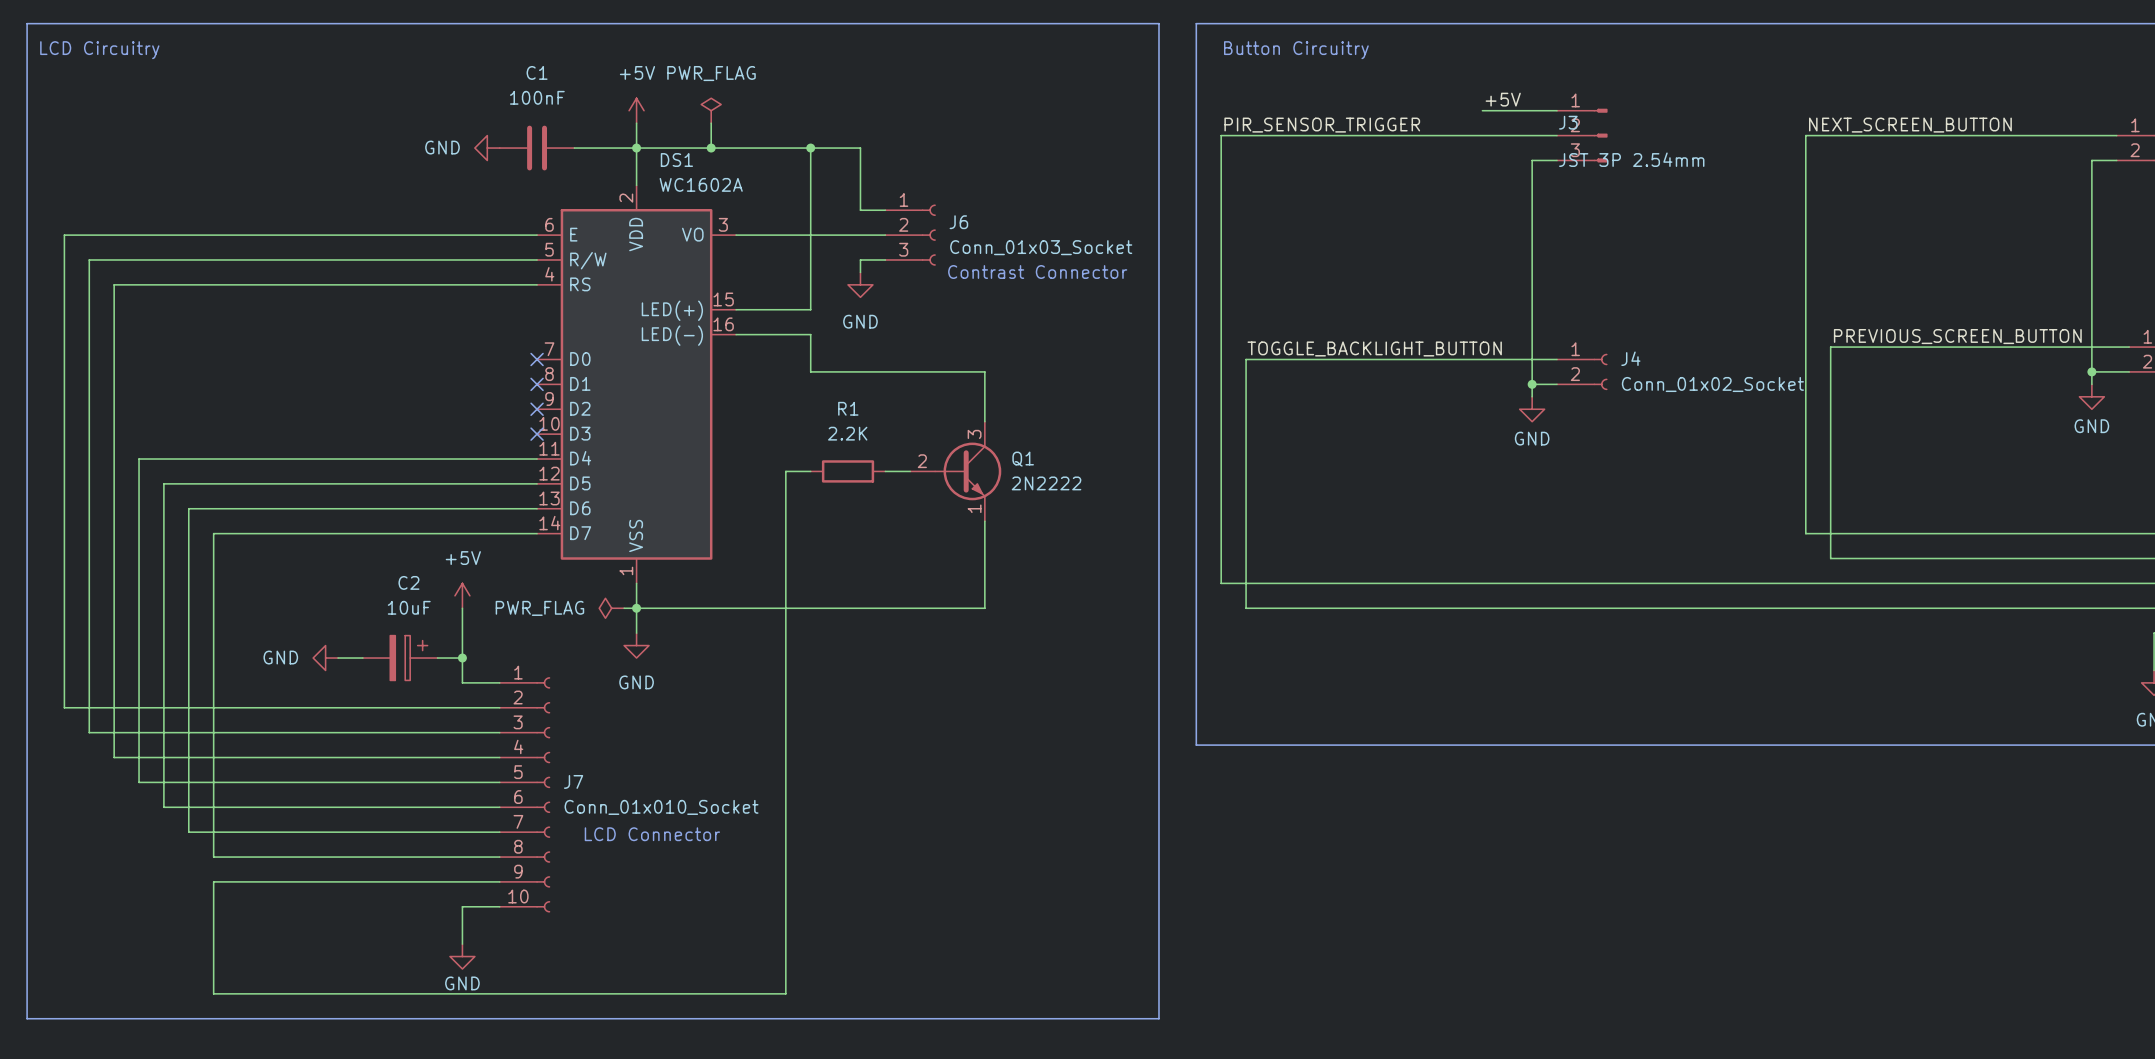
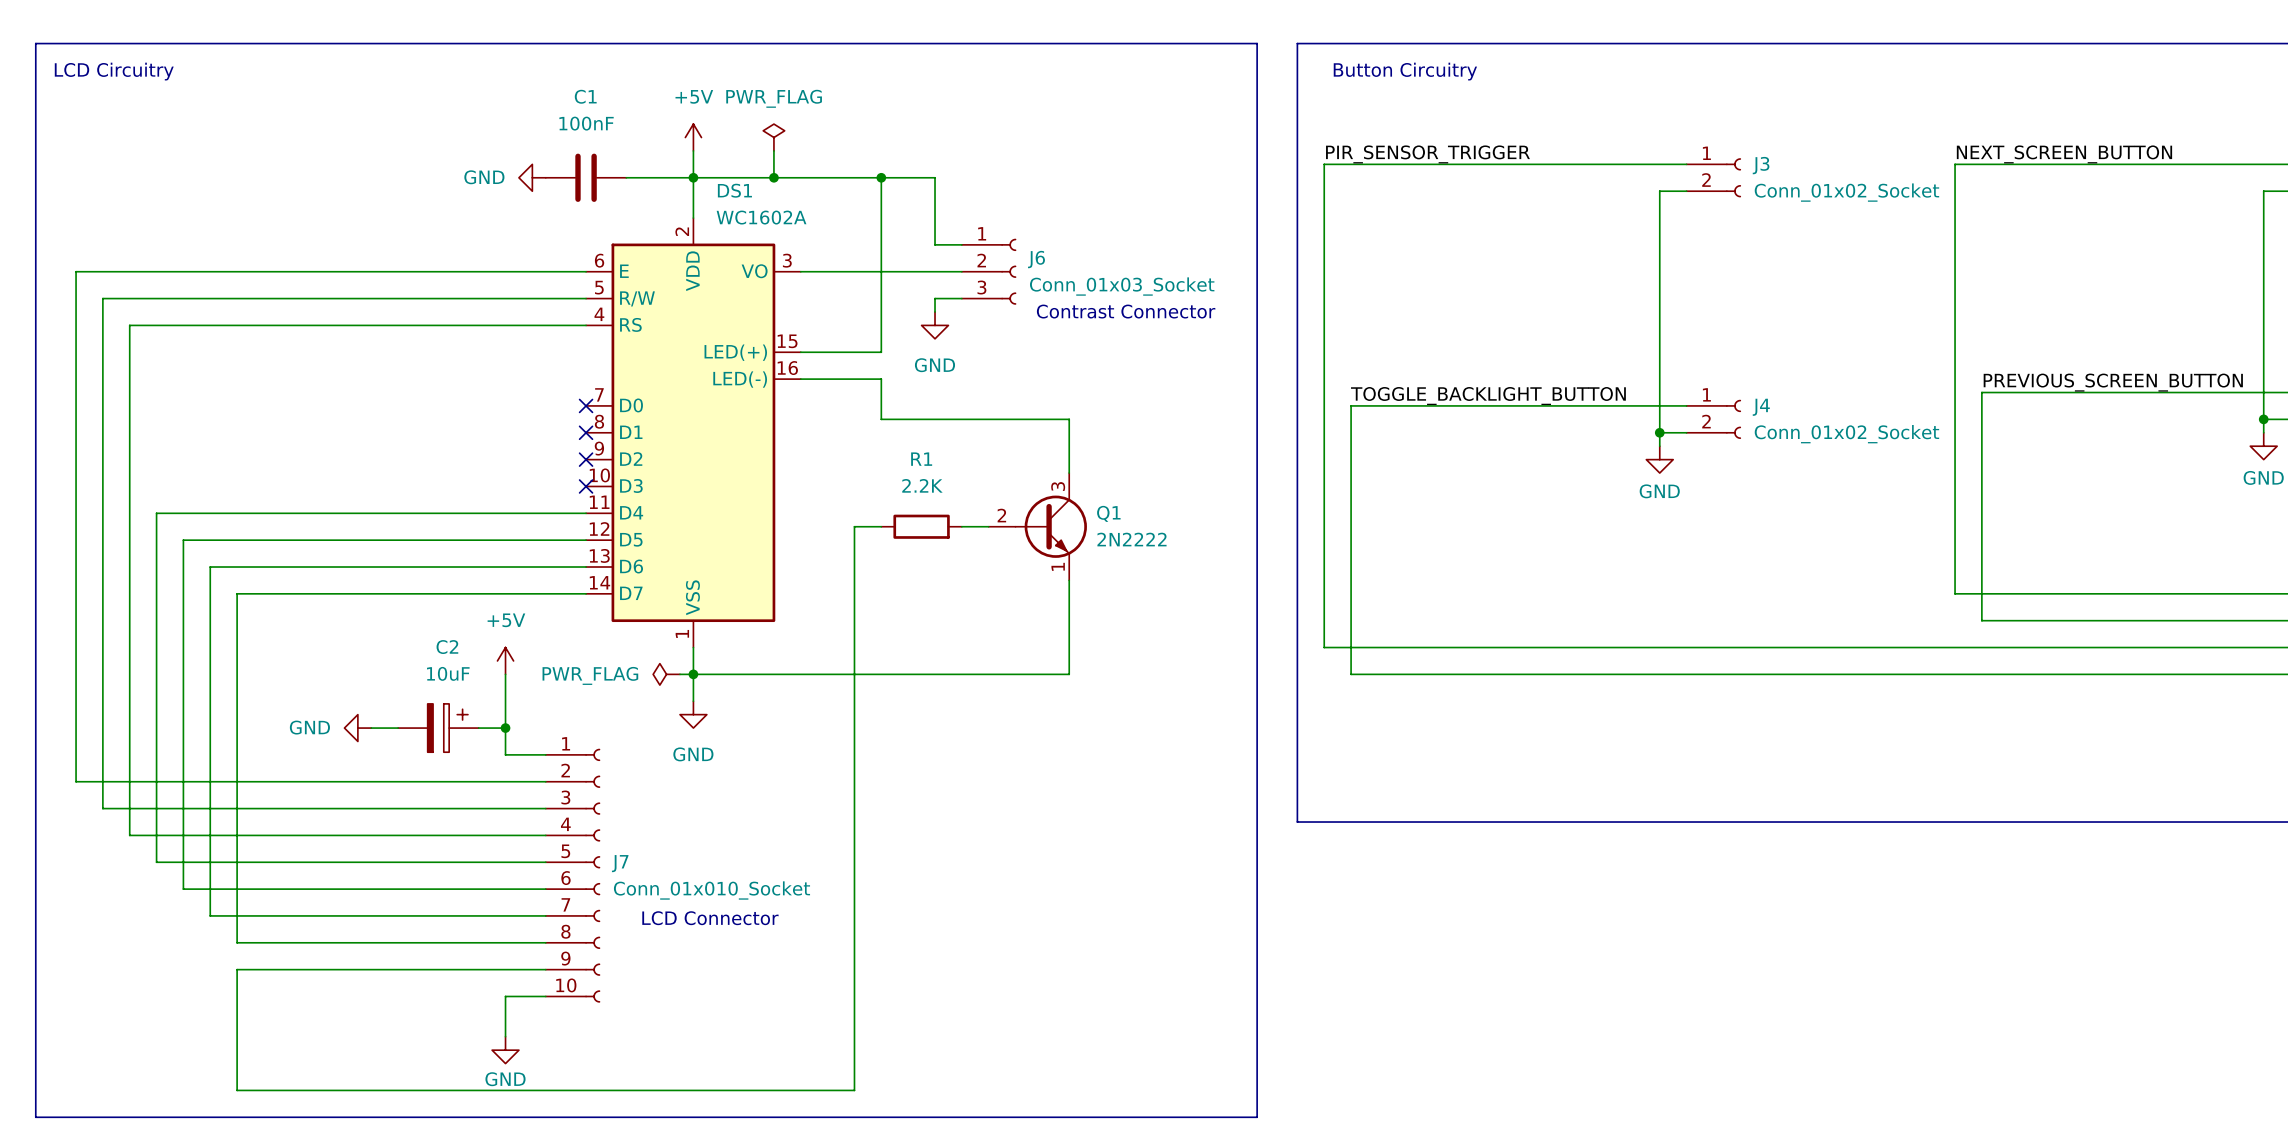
label: +5V (1503, 99) -> none
J3 symbol: [1557, 108, 1608, 163] -> [1686, 158, 1742, 198]
wire: (1482, 110) (1557, 110) -> none
J3 name position: J3 (1568, 122) -> J3 (1761, 165)
J3 value: JST 3P 2.54mm (1631, 159) -> Conn_01x02_Socket (1846, 192)

